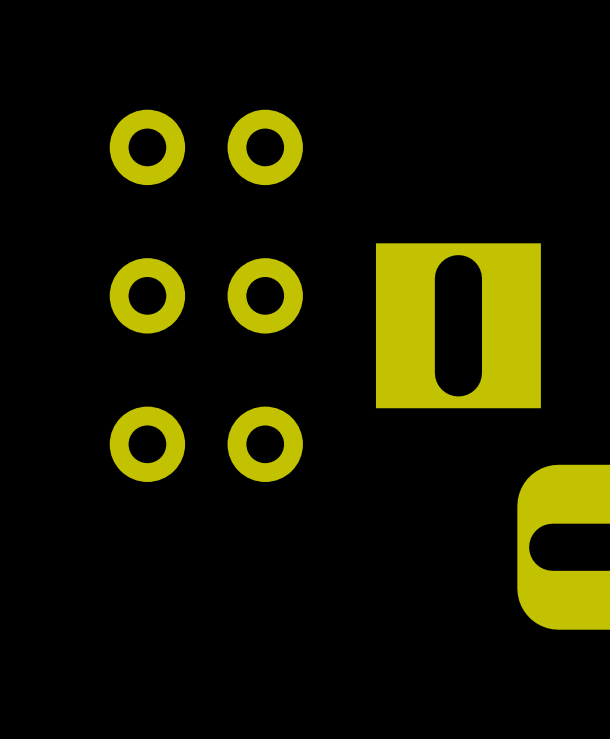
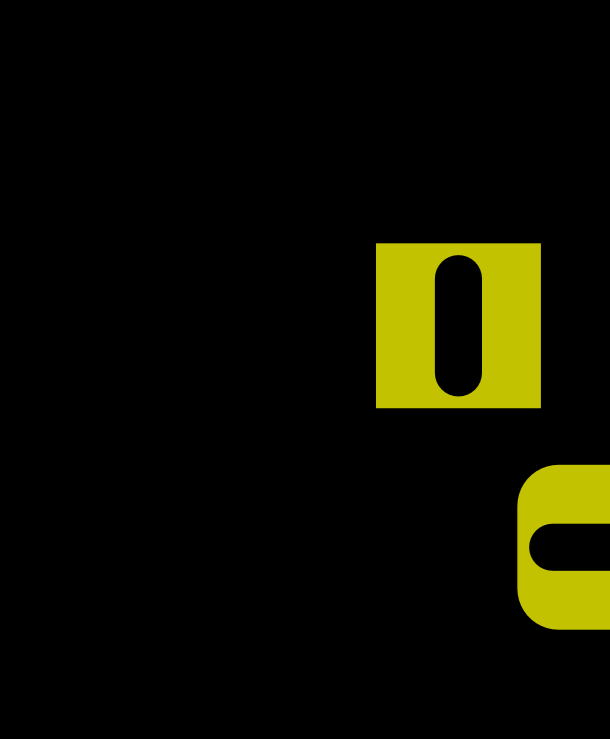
part: (206, 147) -> none
part: (206, 295) -> none
part: (206, 444) -> none

